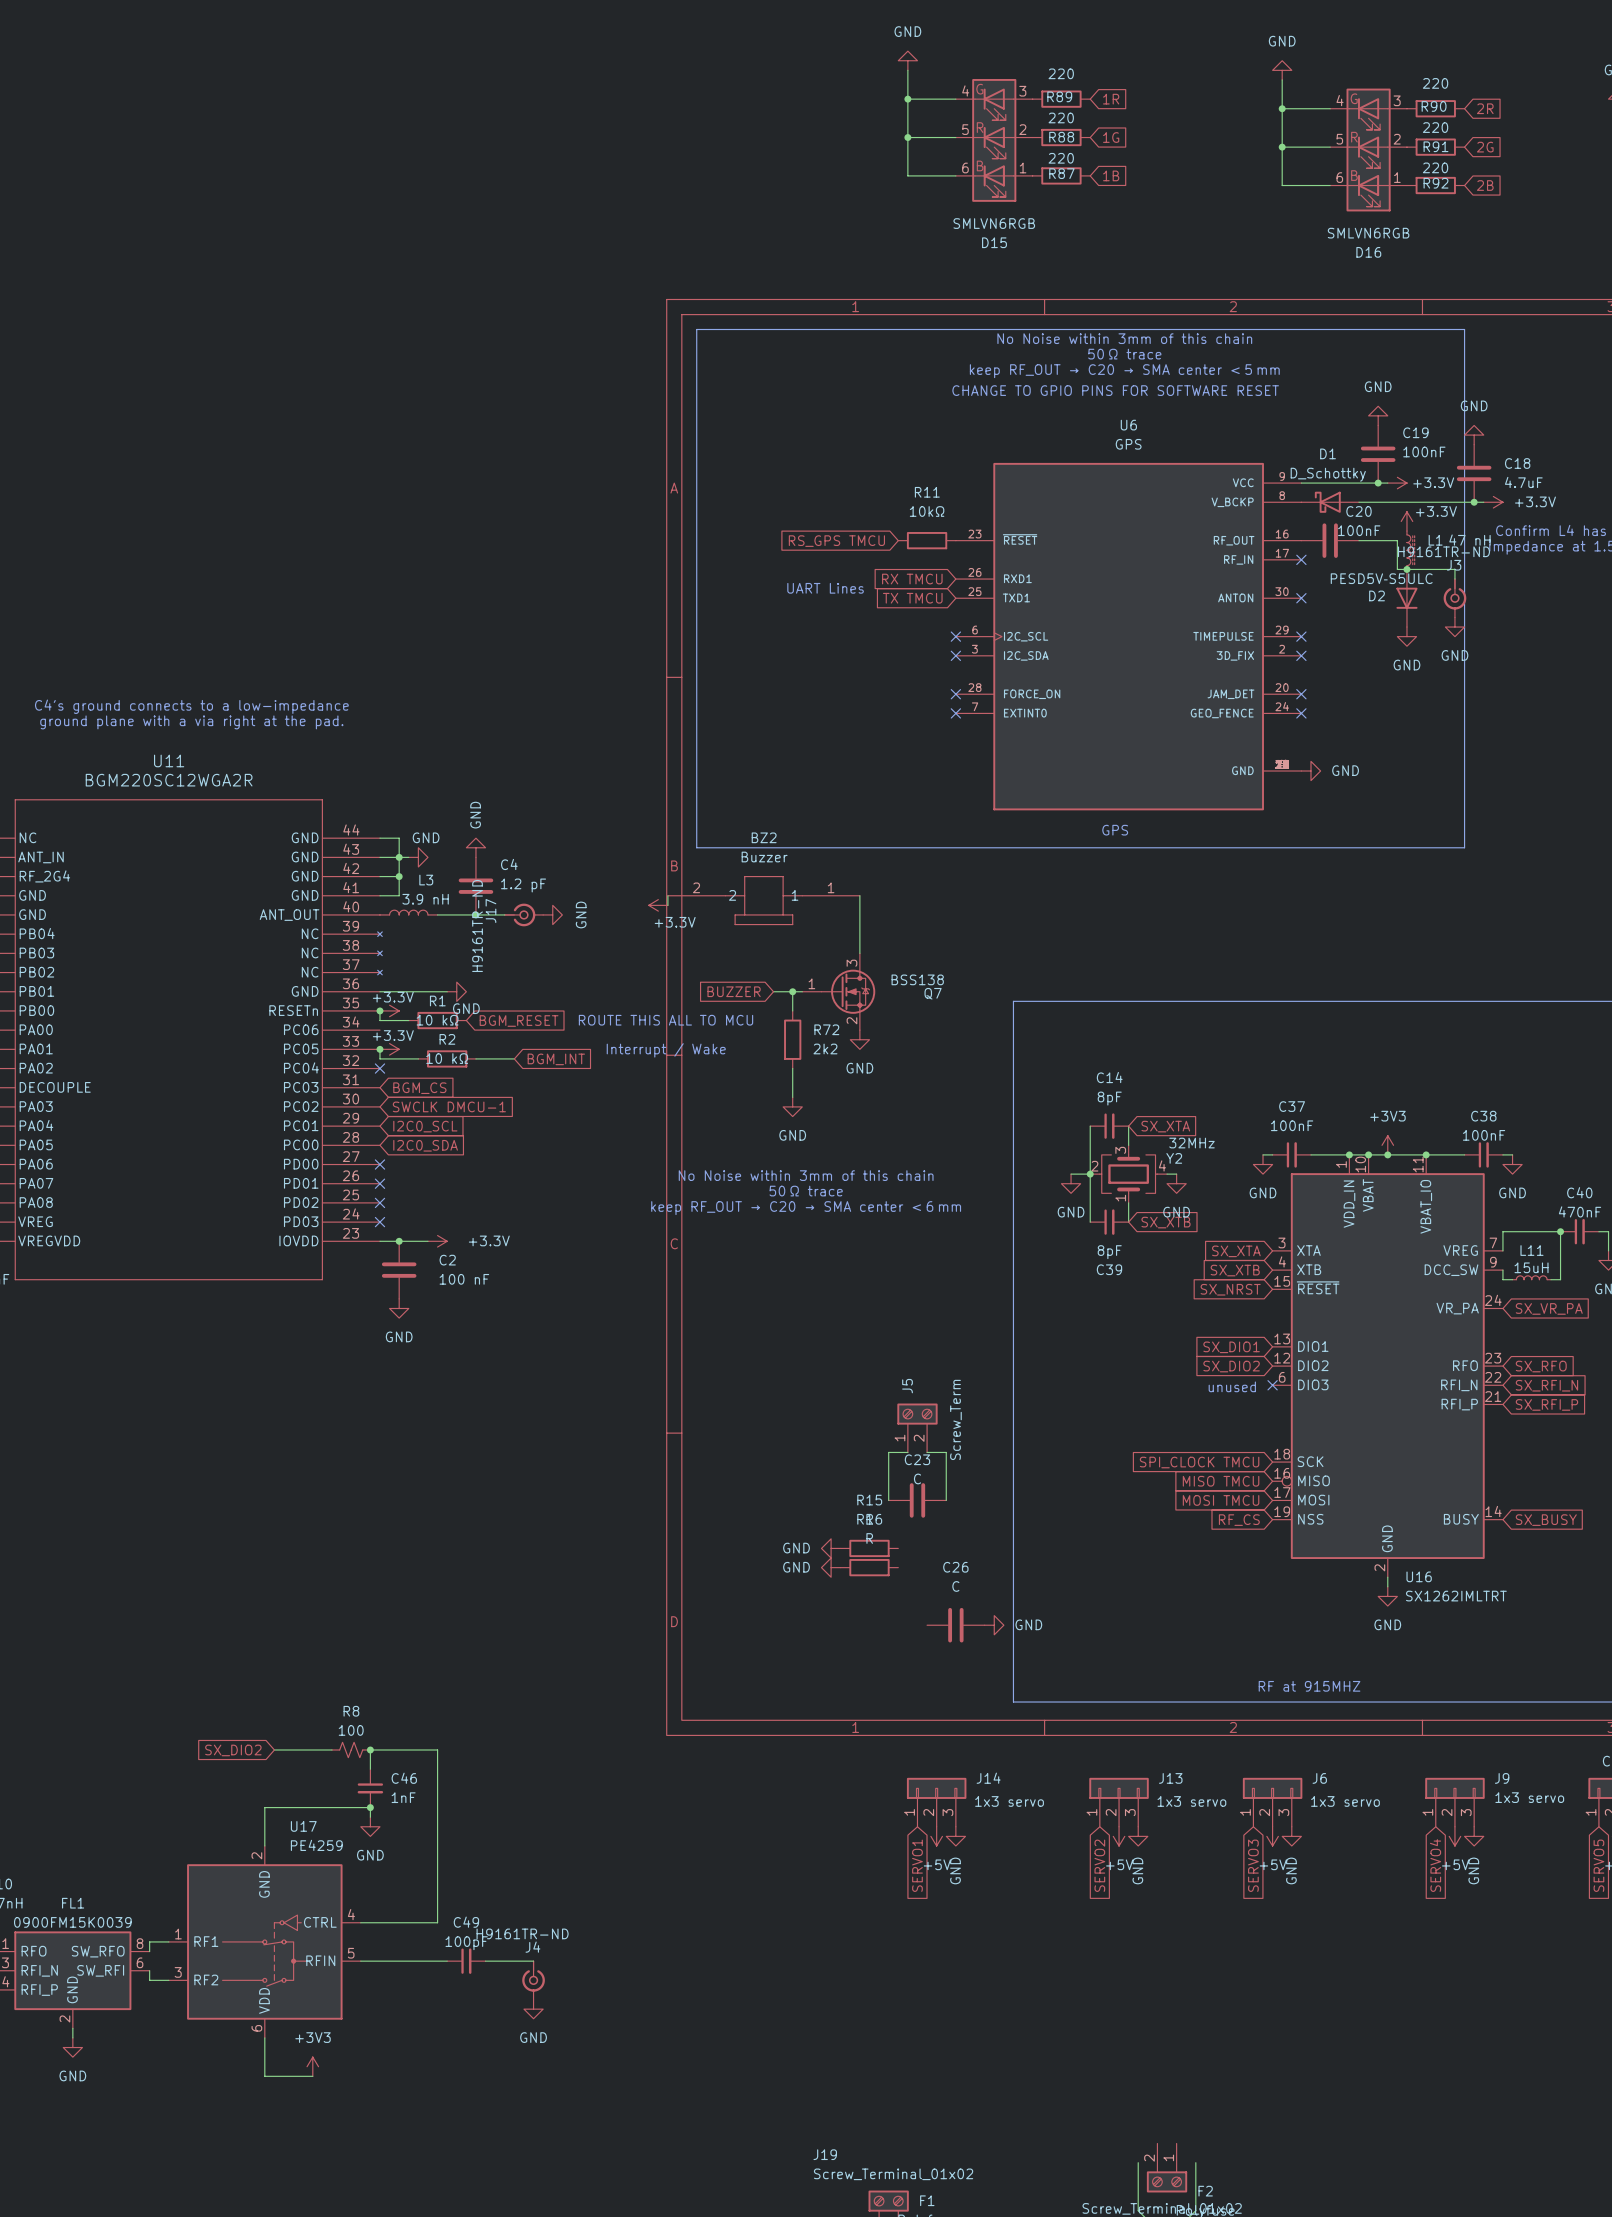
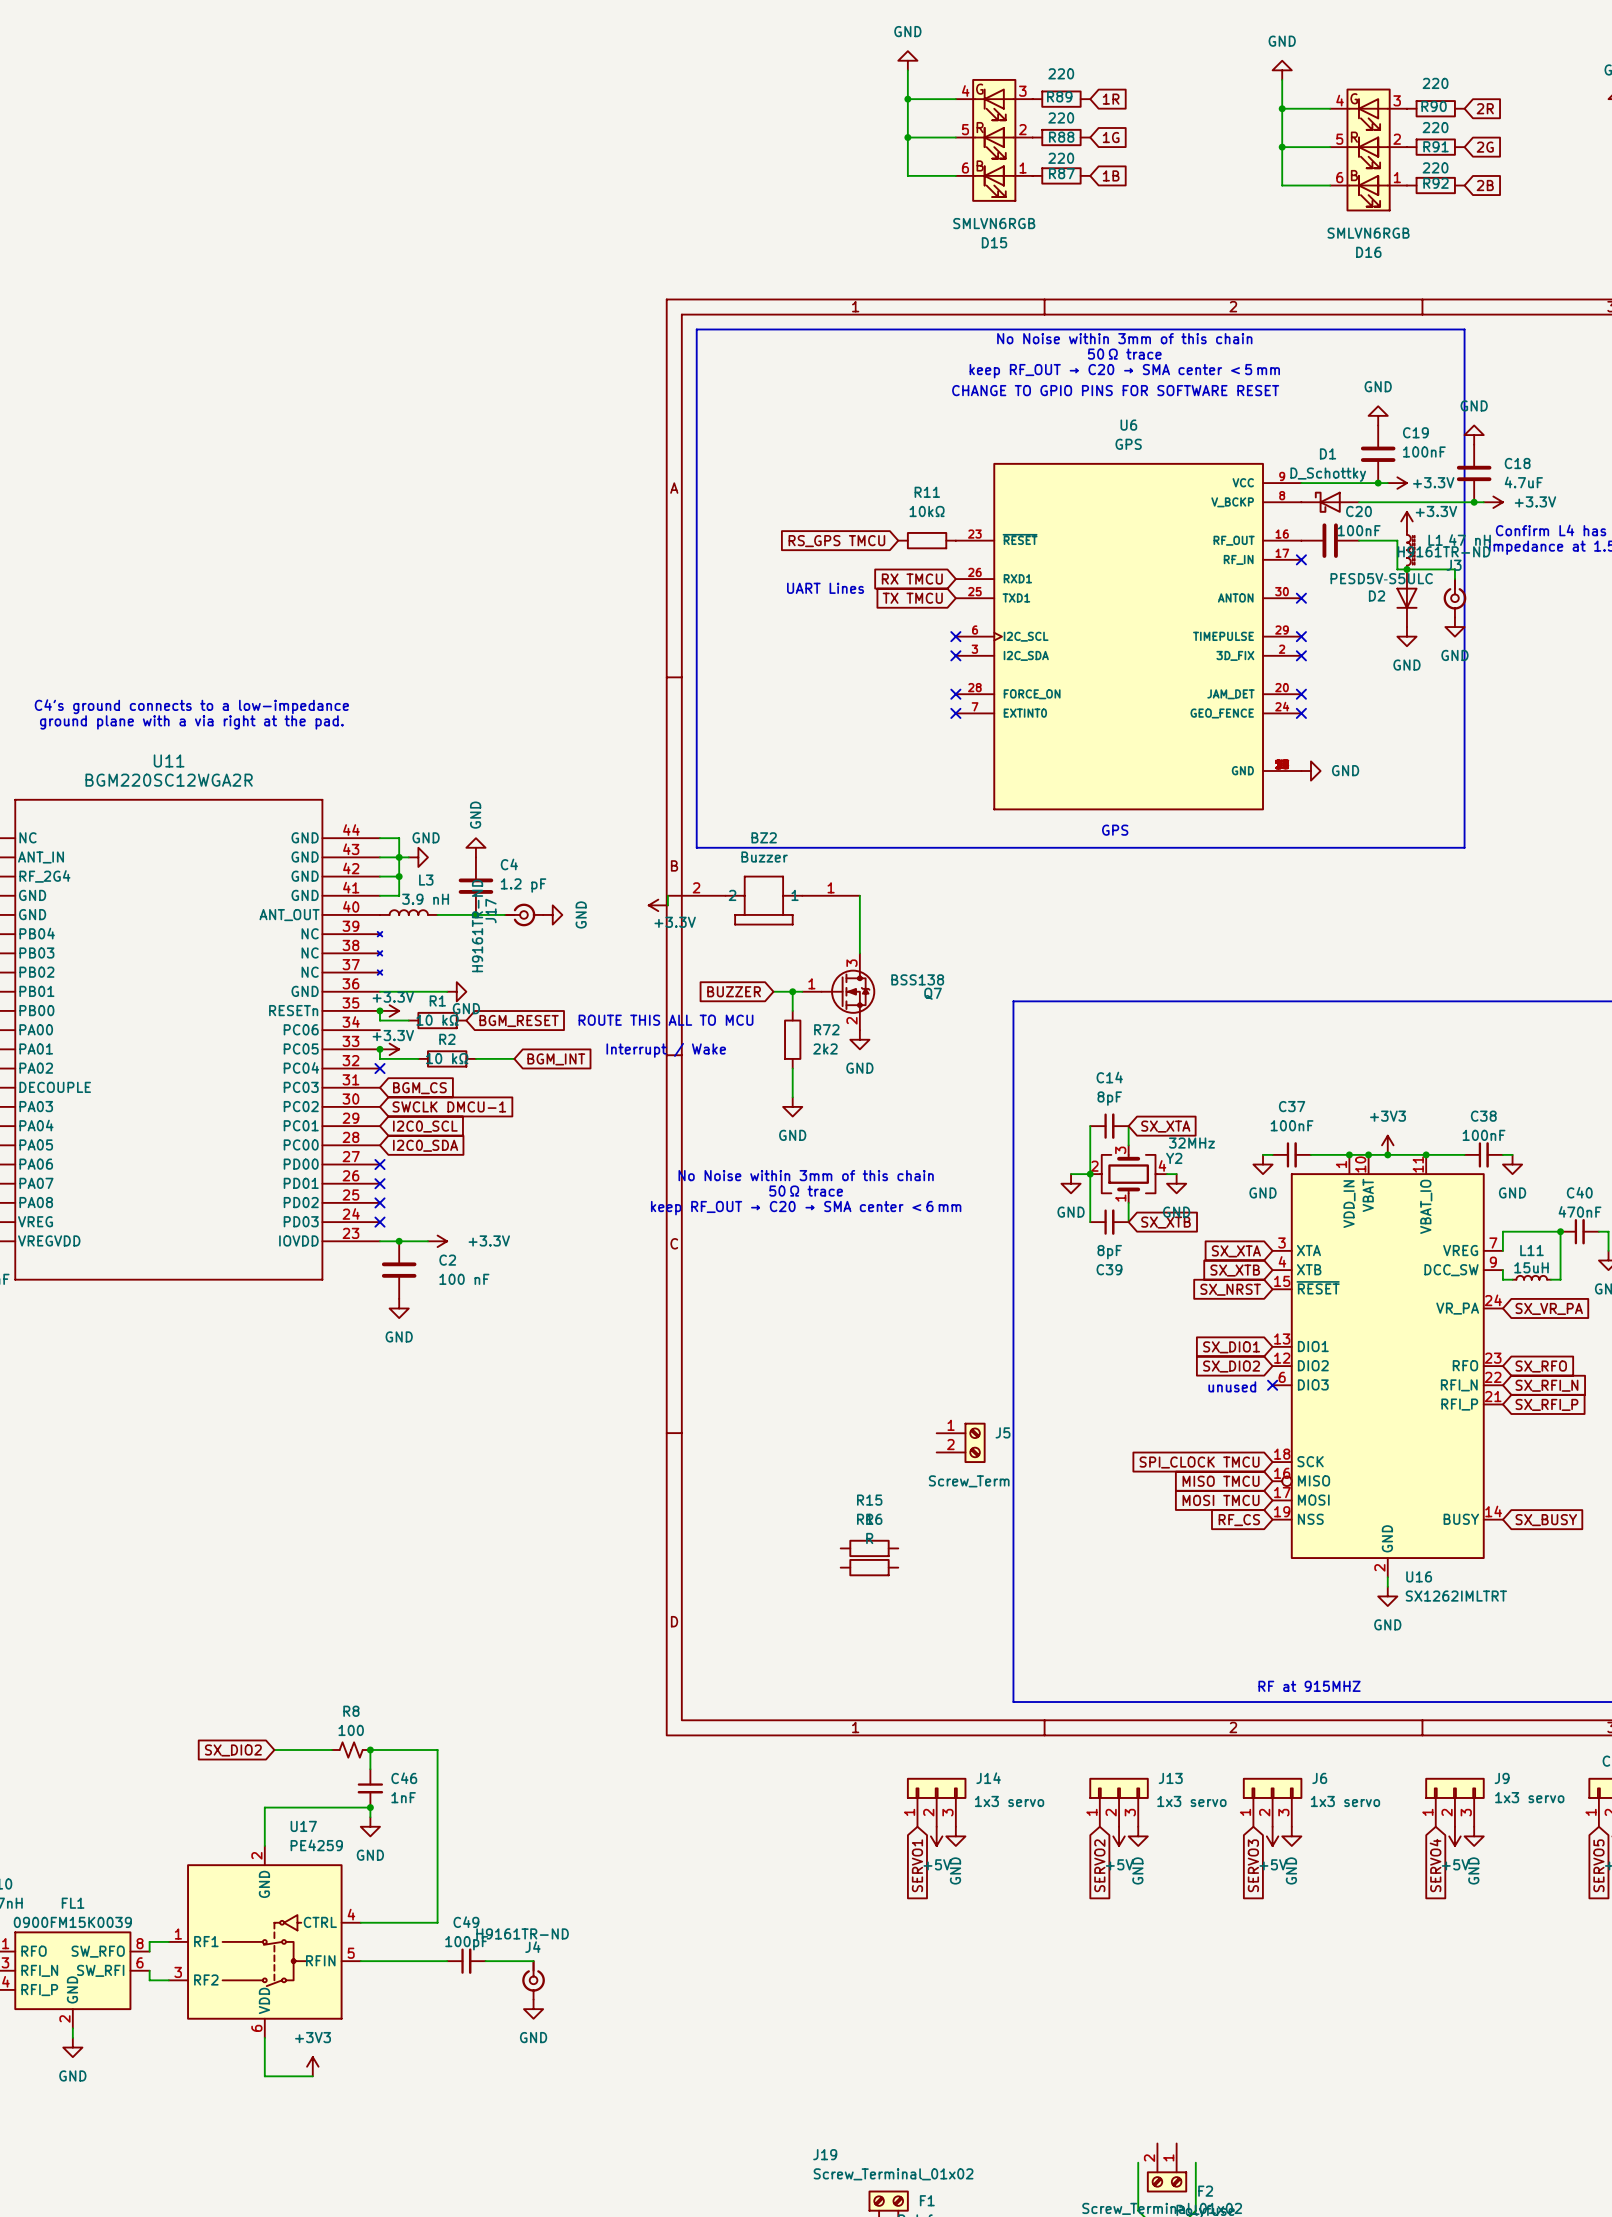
J5 rotation: 0° (917, 1414) -> 90° clockwise (975, 1442)
J5 position: (917, 1427) -> (961, 1442)
wire: (907, 1452) (888, 1452) (888, 1500) -> none
wire: (927, 1452) (946, 1452) (946, 1500) -> none
C23: C (917, 1500) -> none
power symbol: GND (831, 1548) -> none
power symbol: GND (831, 1567) -> none
C26: C (955, 1625) -> none
power symbol: GND (994, 1625) -> none

